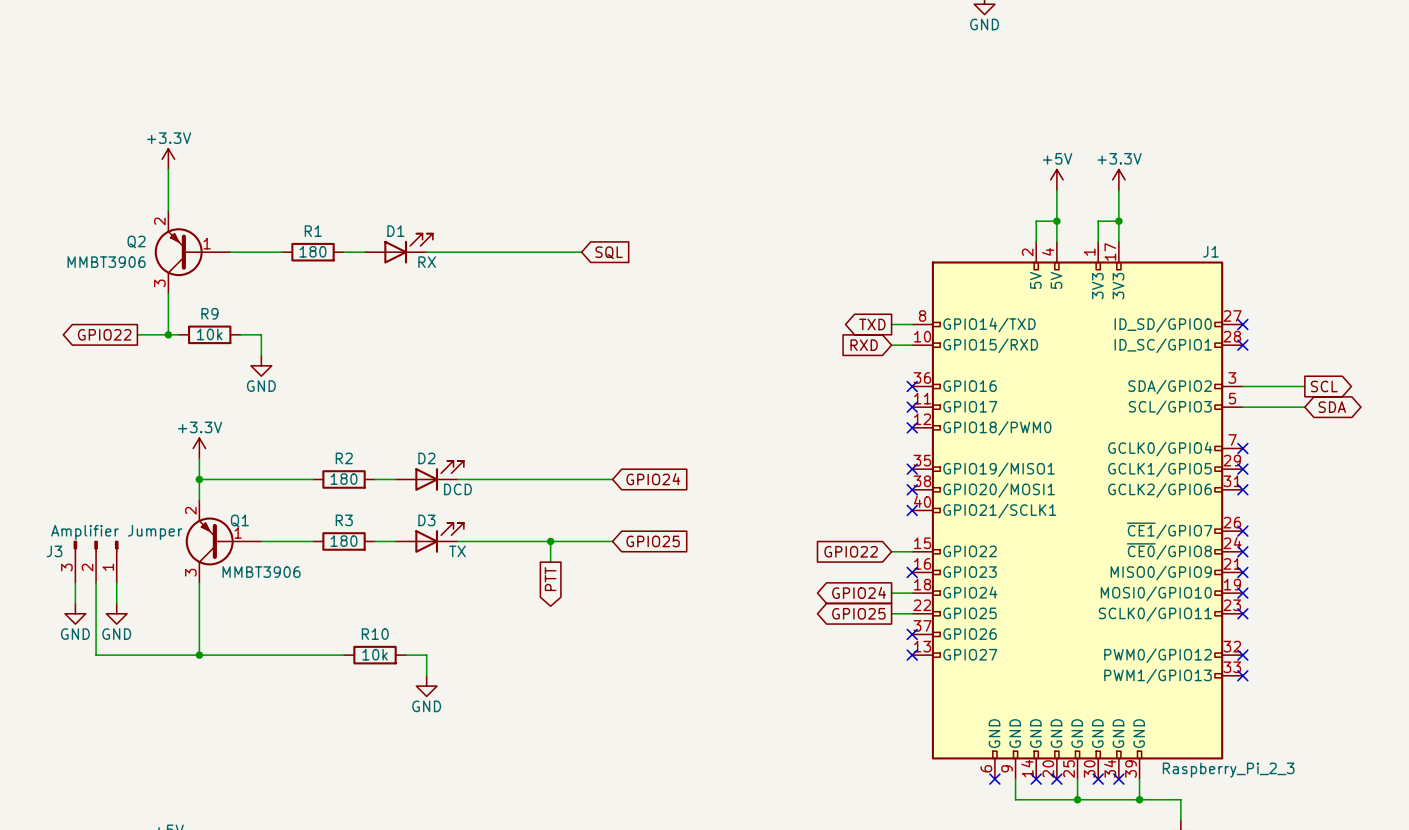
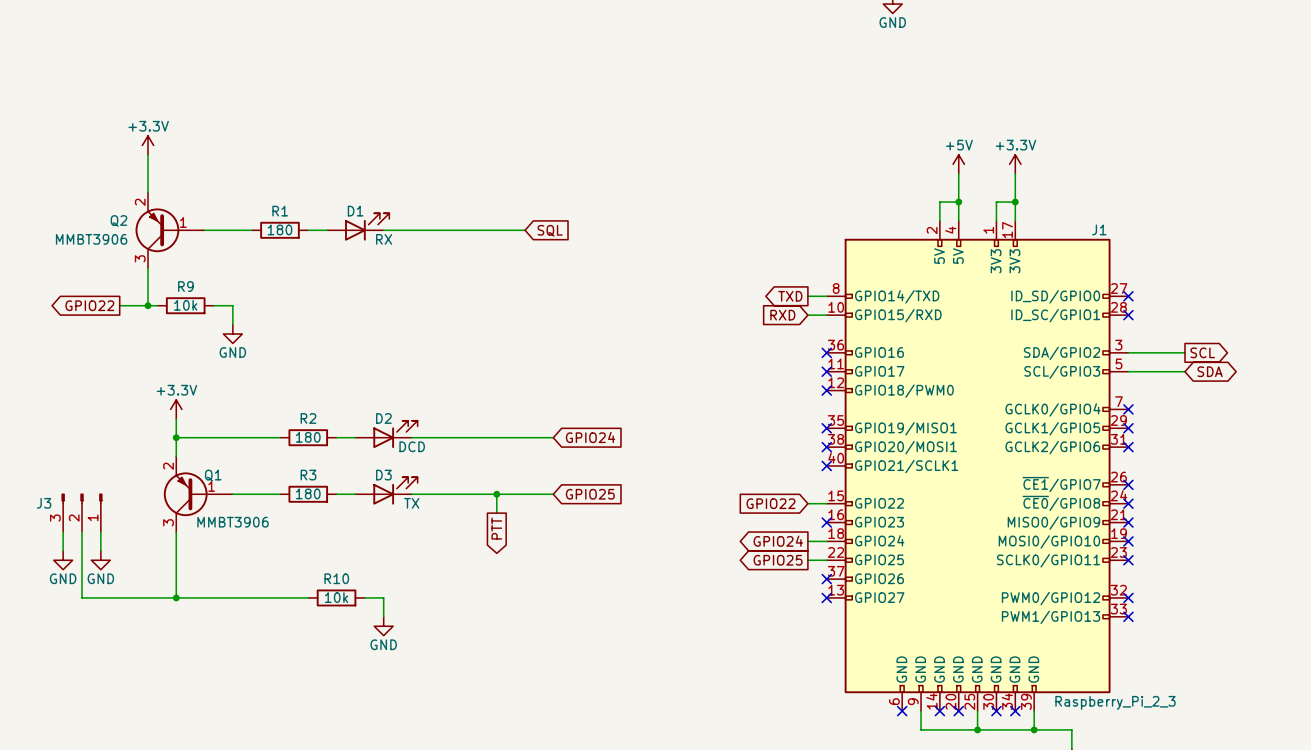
J3 value: Amplifier Jumper (116, 532) -> none

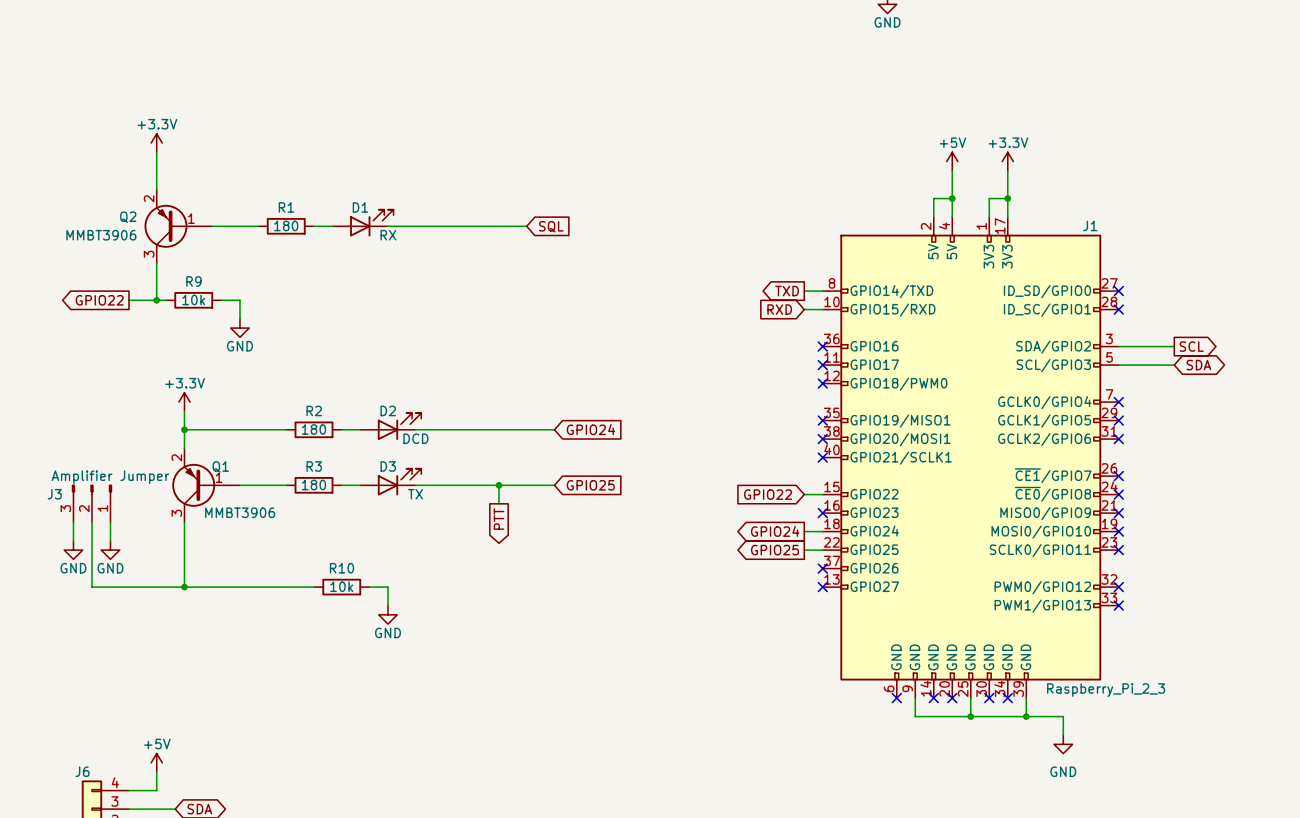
J3 value: none -> Amplifier Jumper (110, 477)

